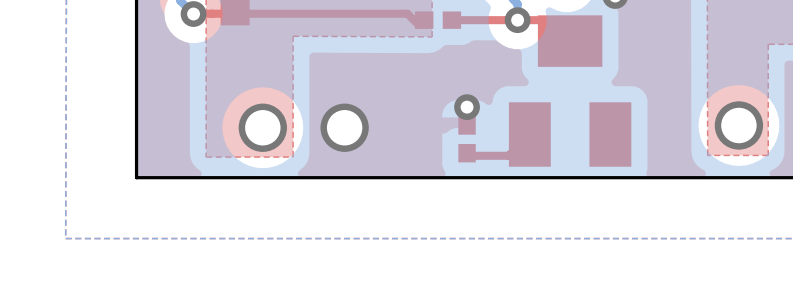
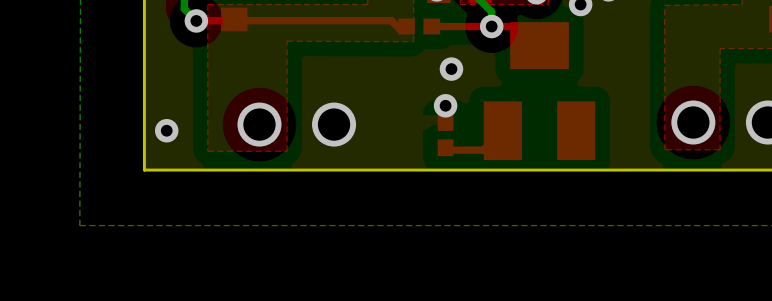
via: none -> (451, 69)
via: none -> (166, 130)

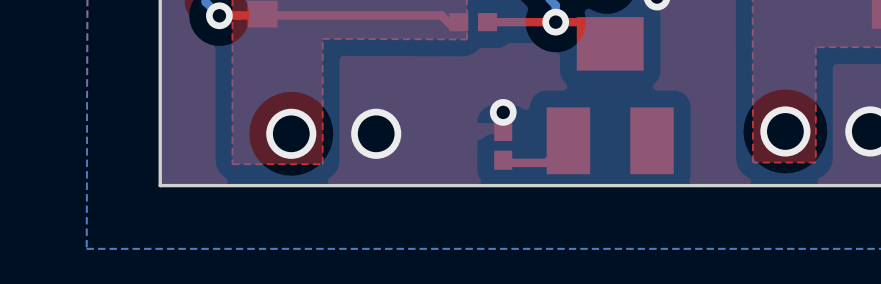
via: (451, 69) -> none
via: (166, 130) -> none

